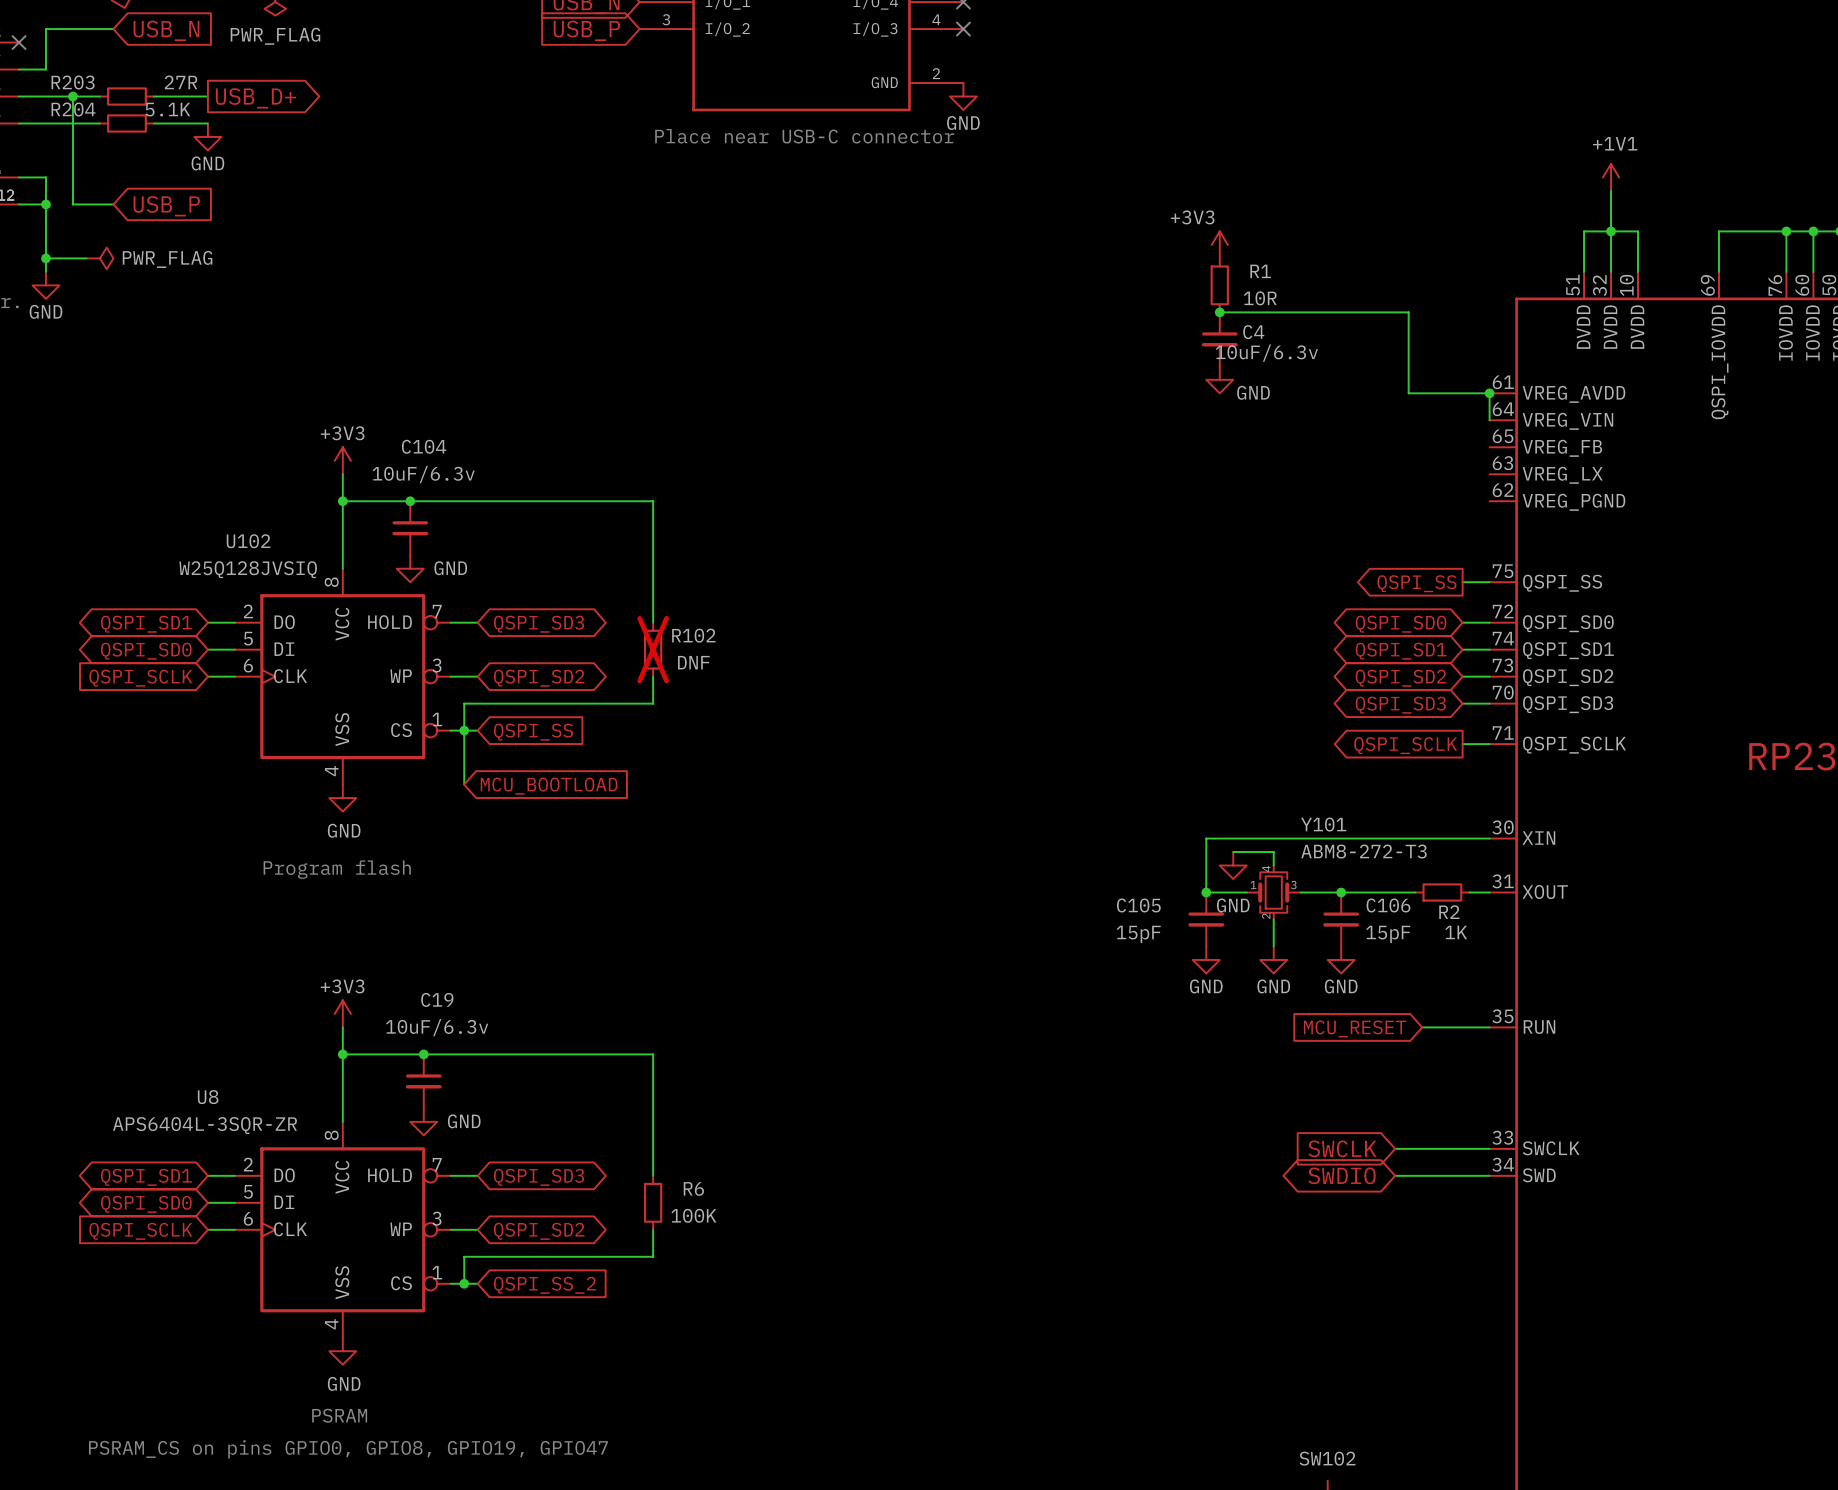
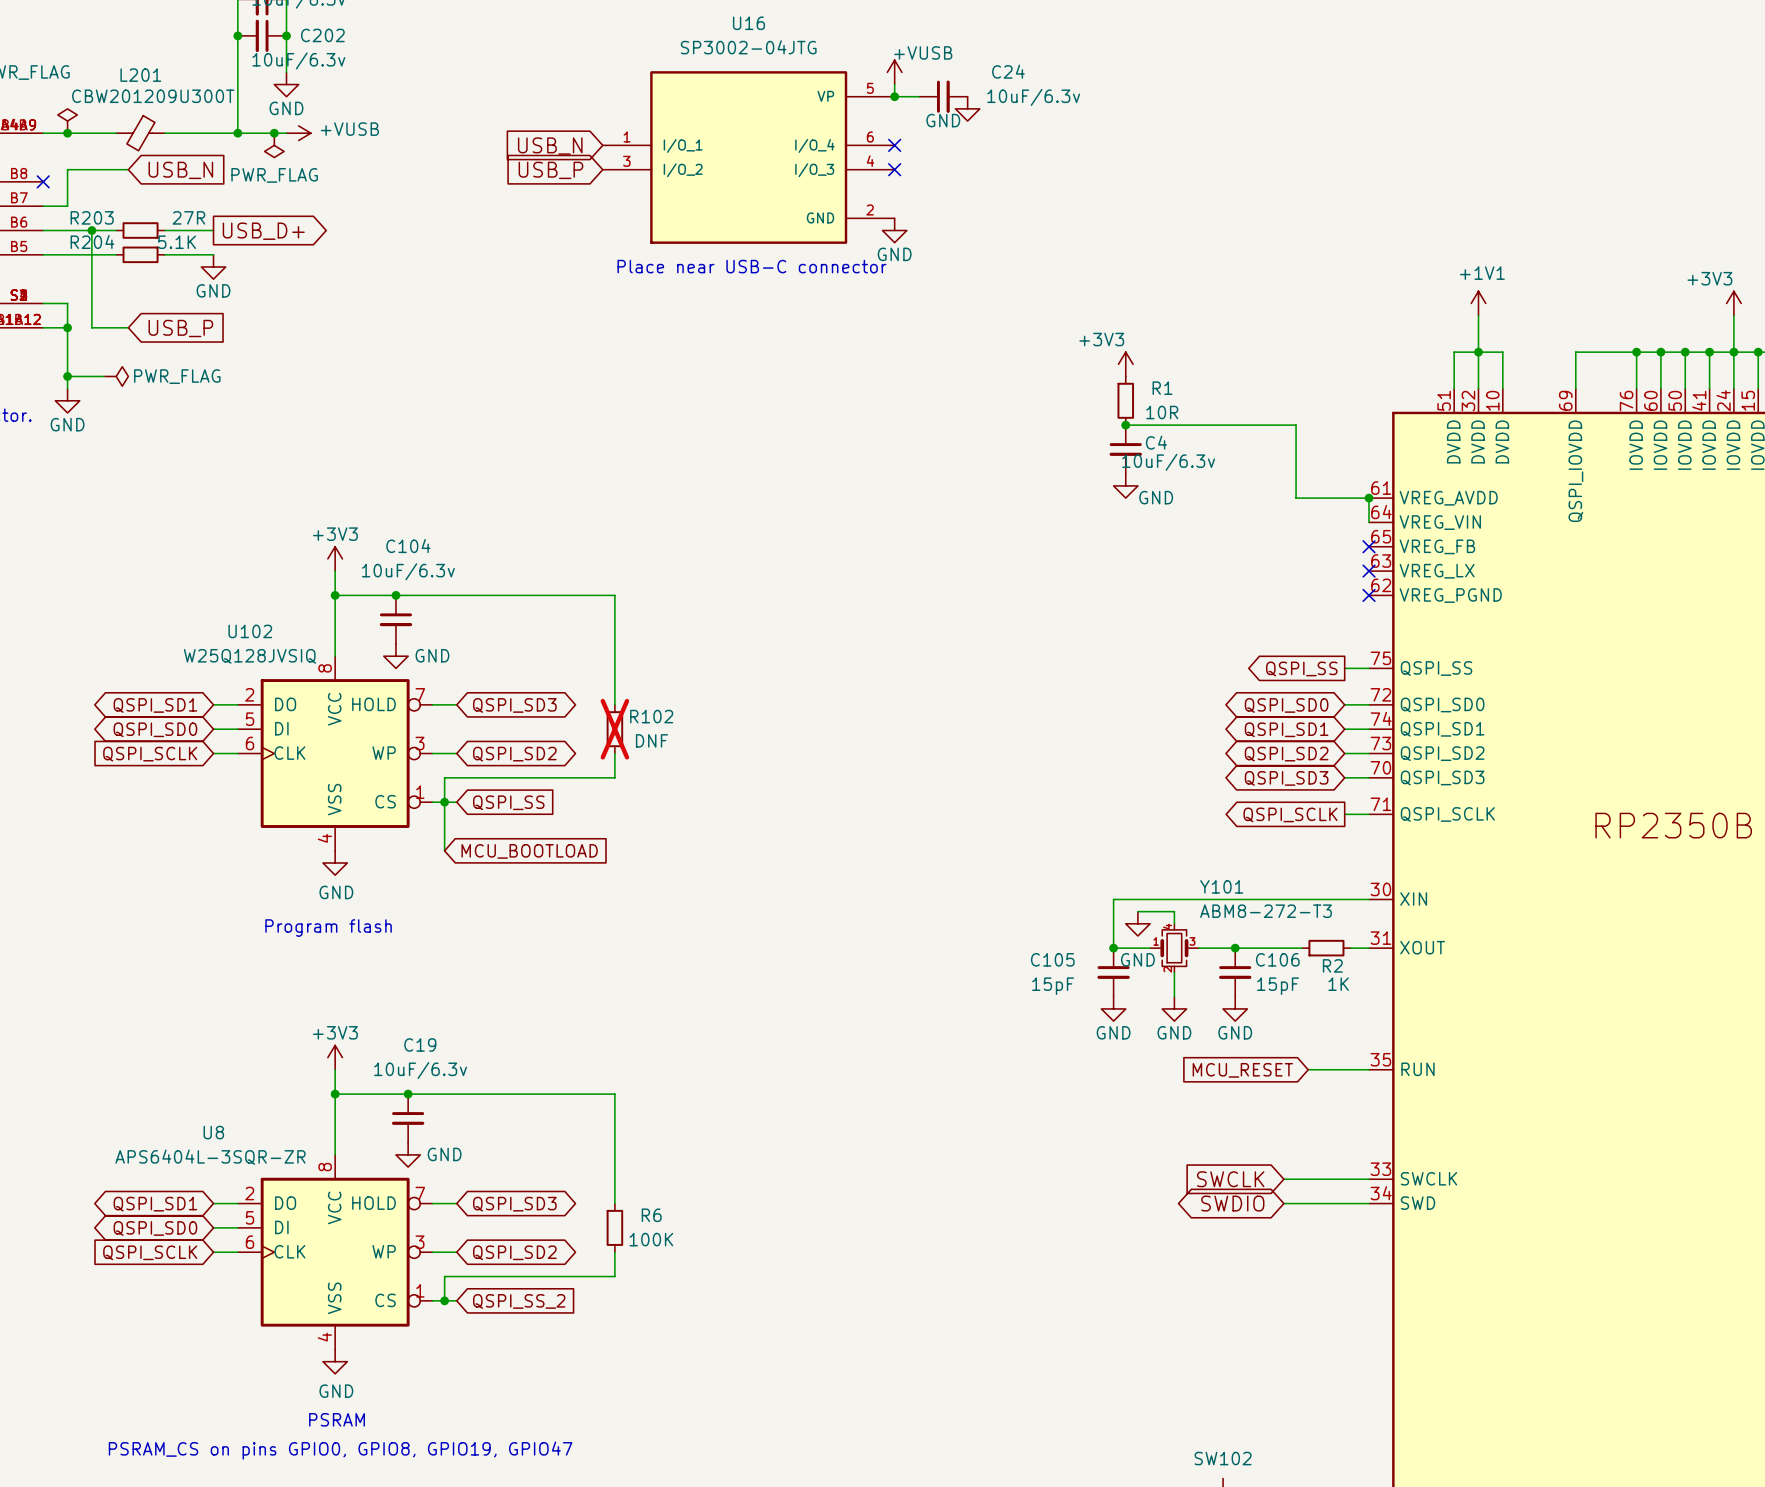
no-connect mark: none -> (1369, 546)
no-connect mark: none -> (1369, 571)
no-connect mark: none -> (1369, 595)

